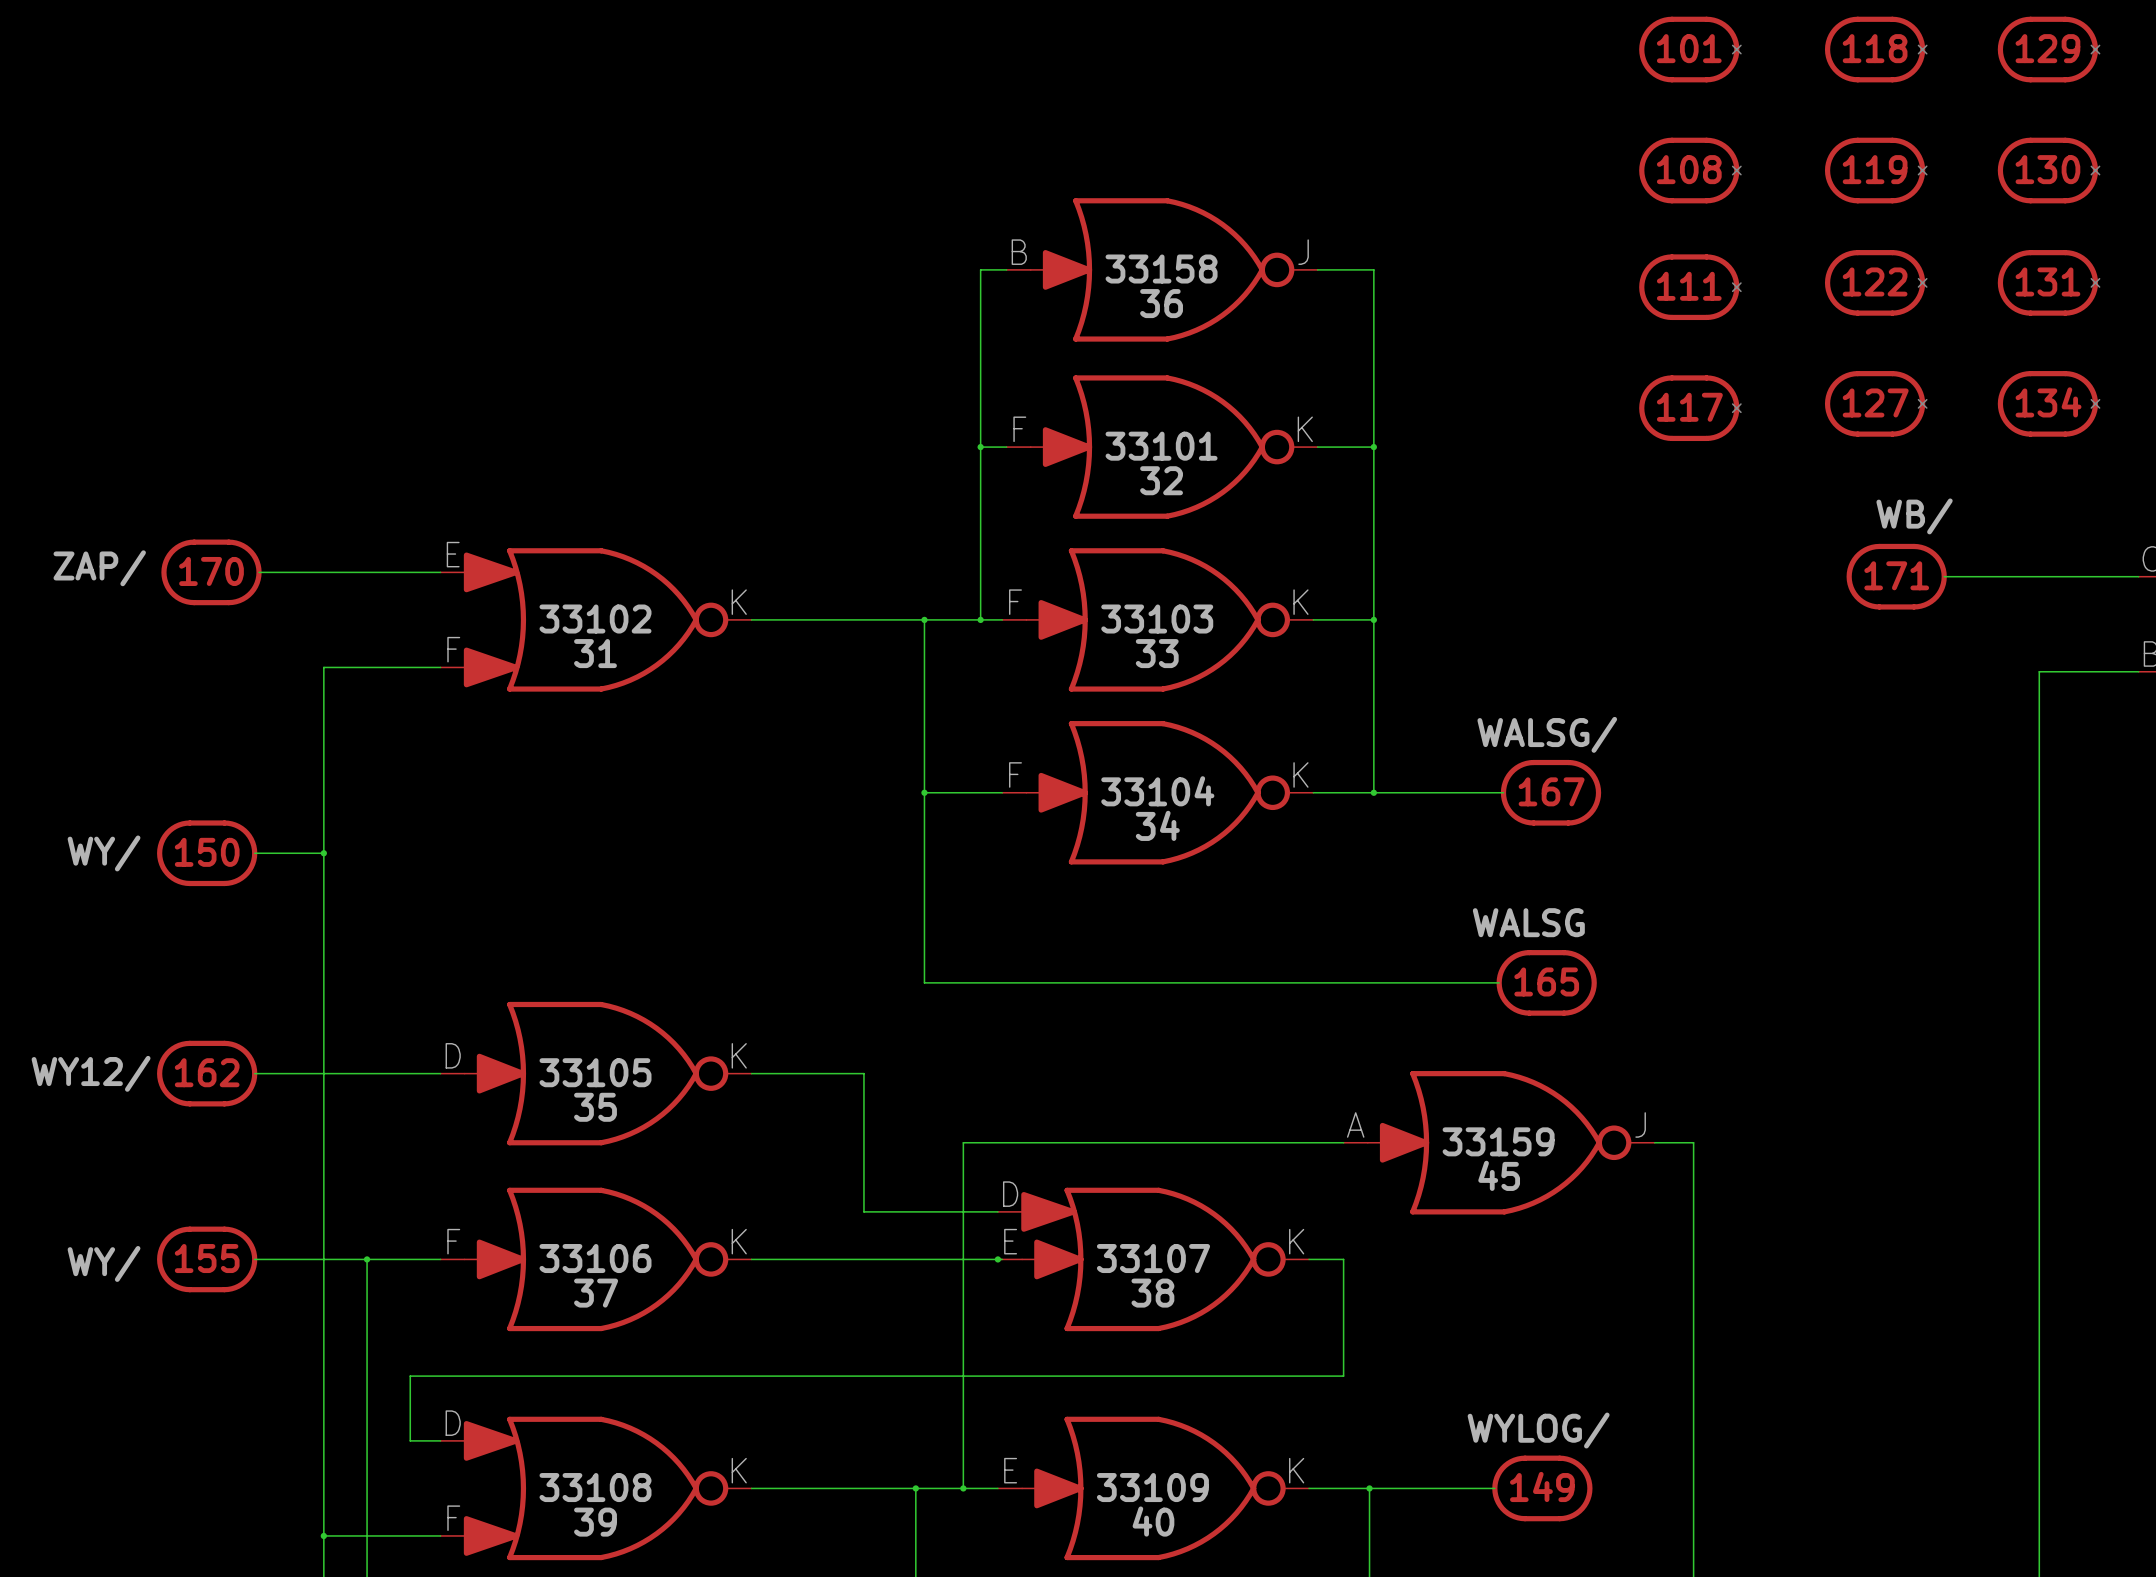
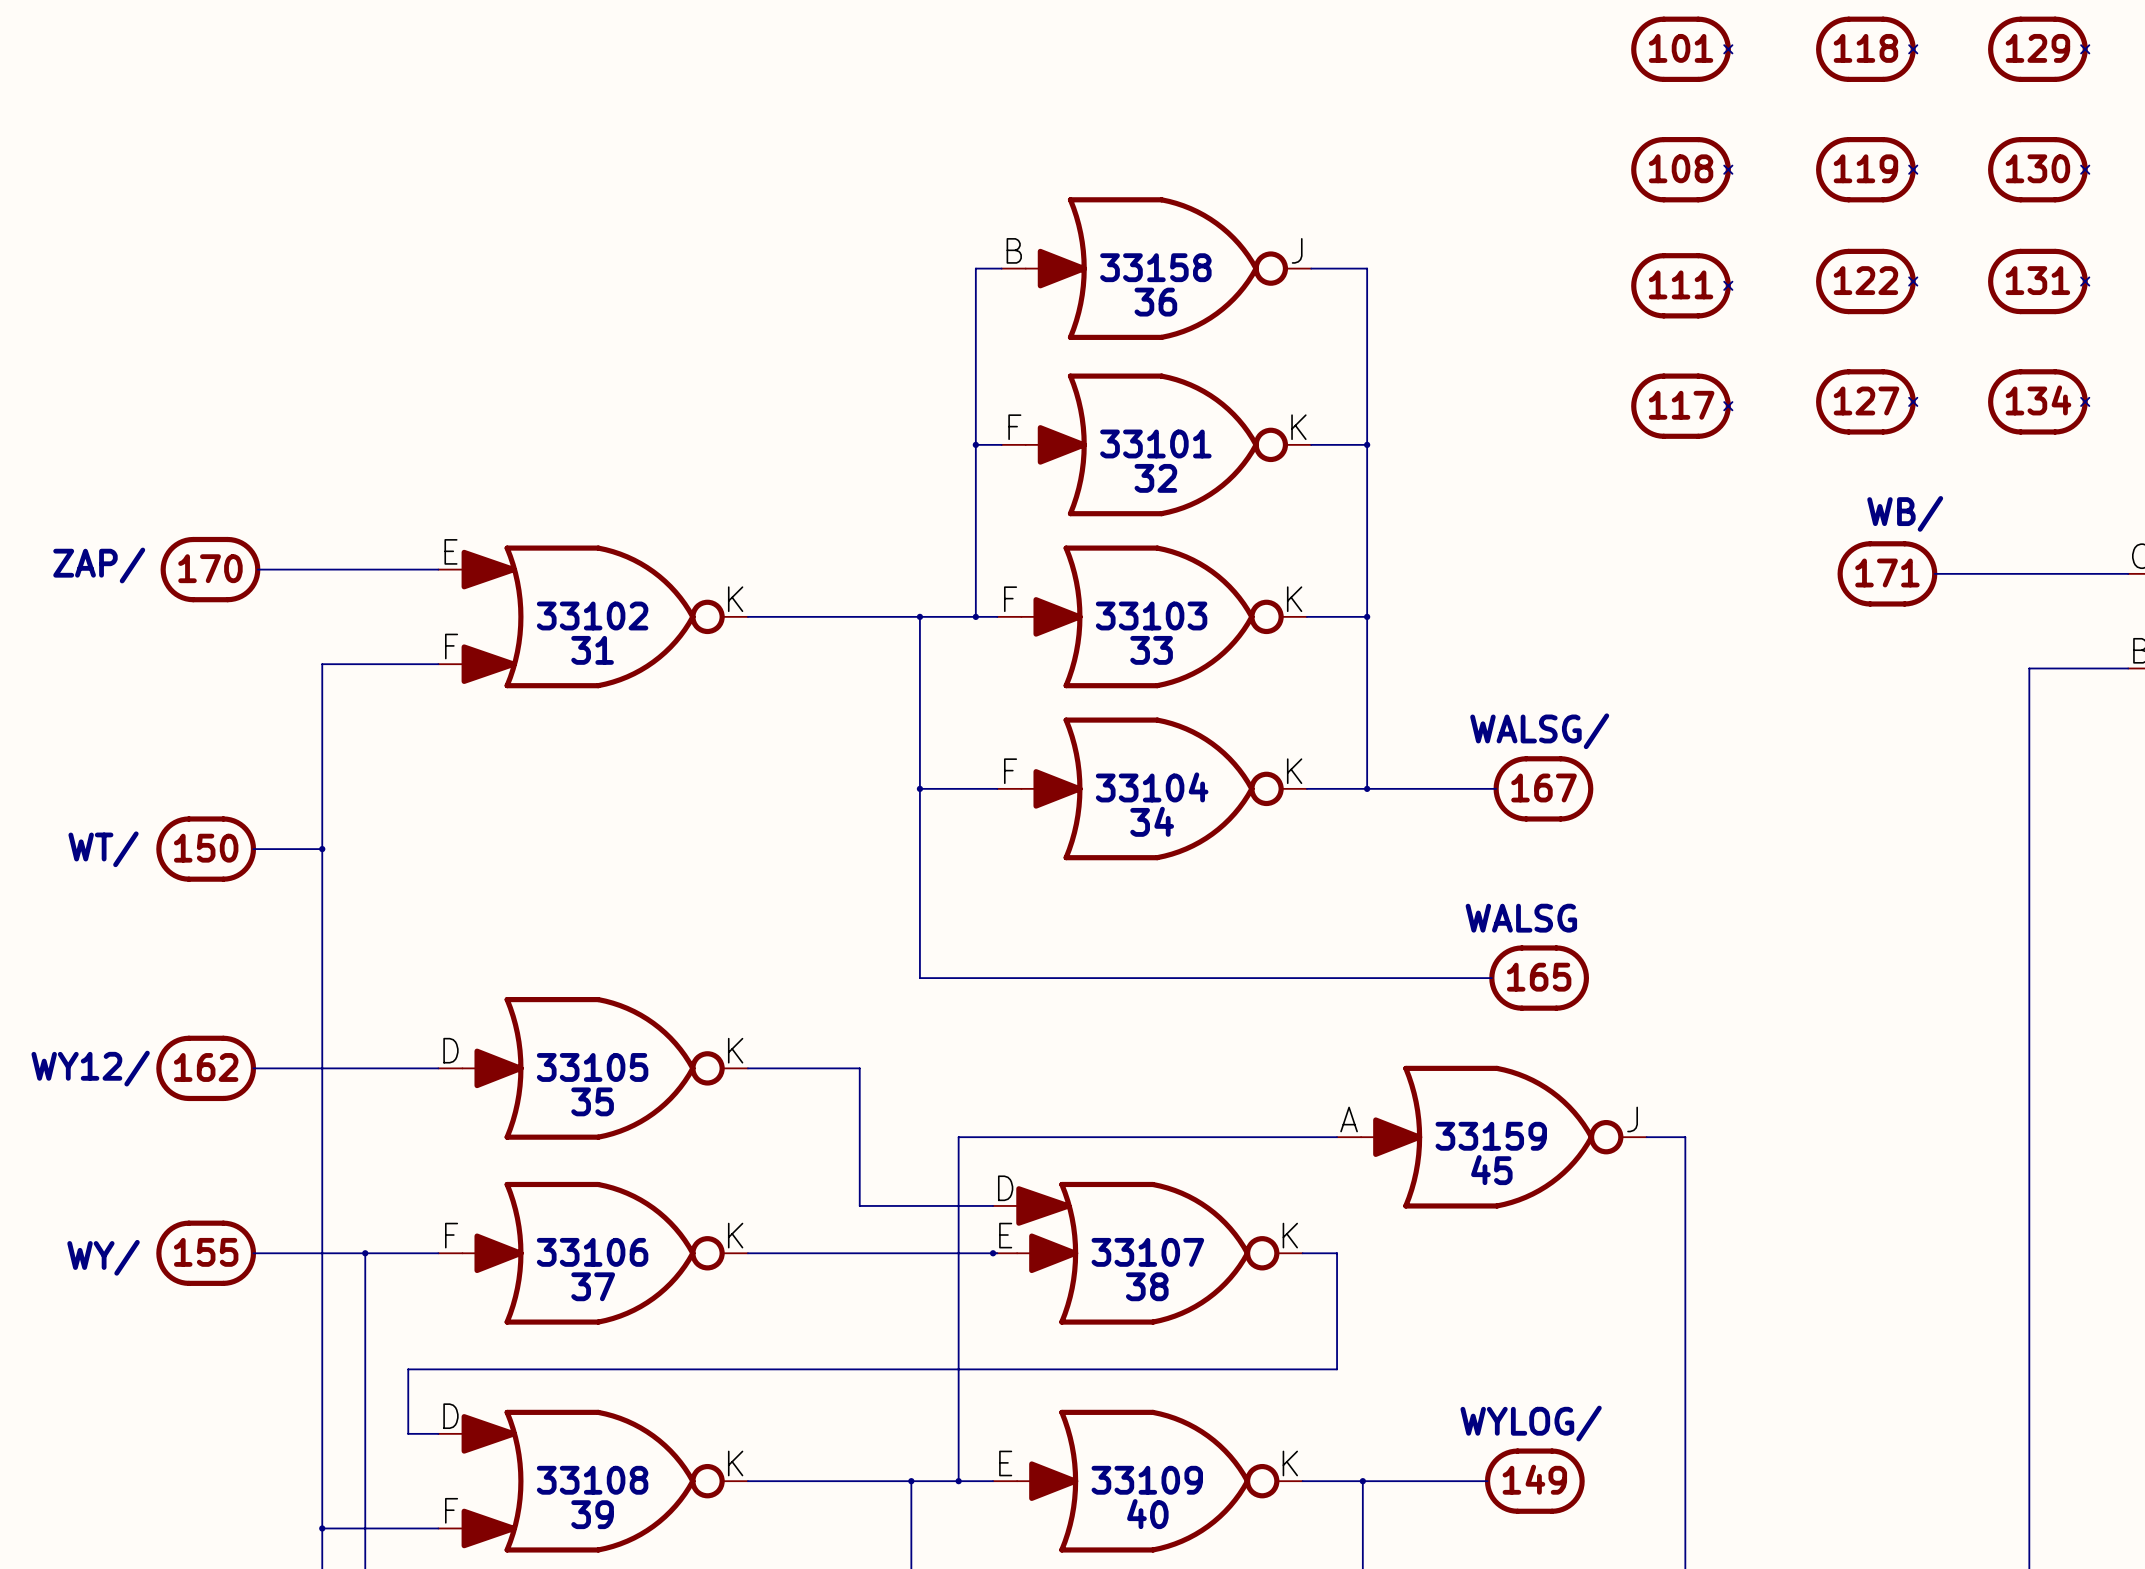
part text: WY/ (104, 853) -> WT/ (103, 849)

